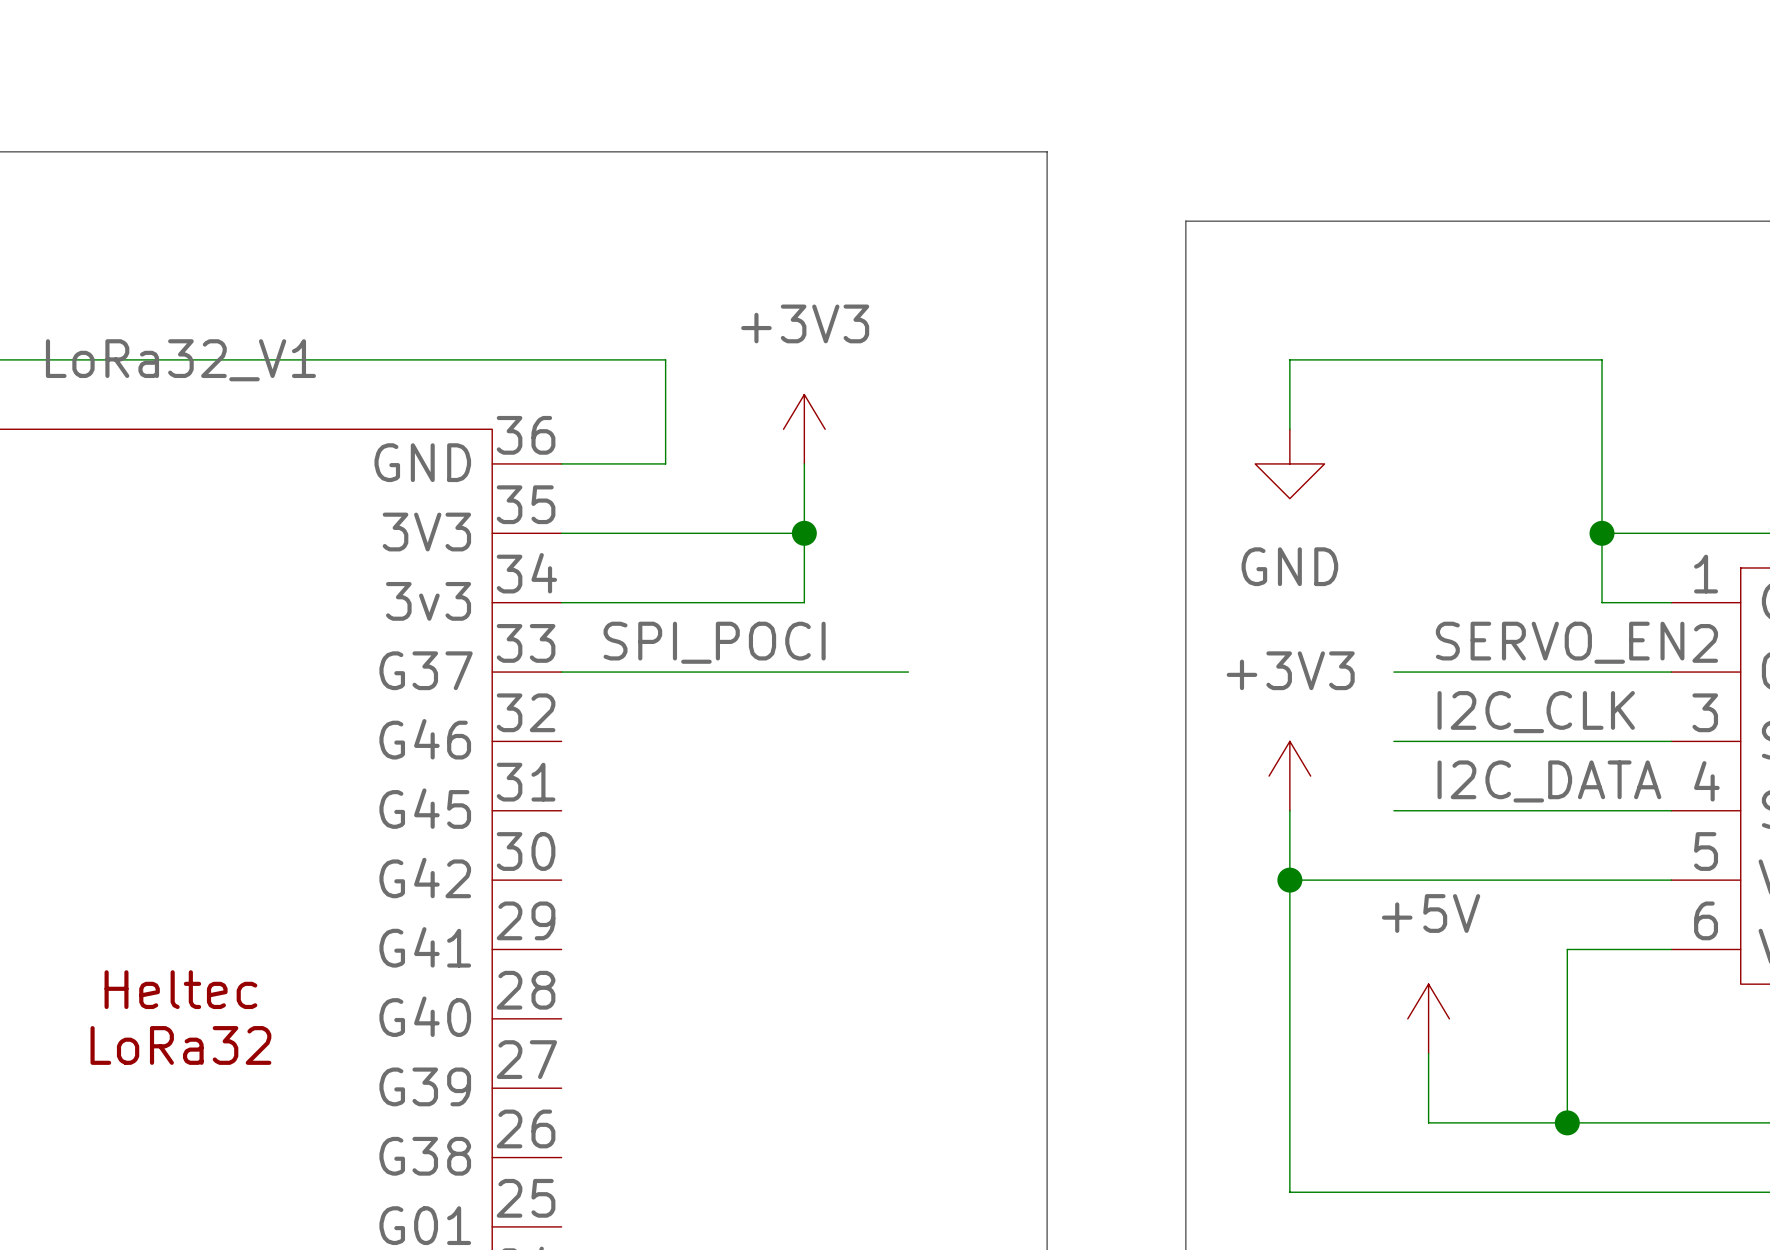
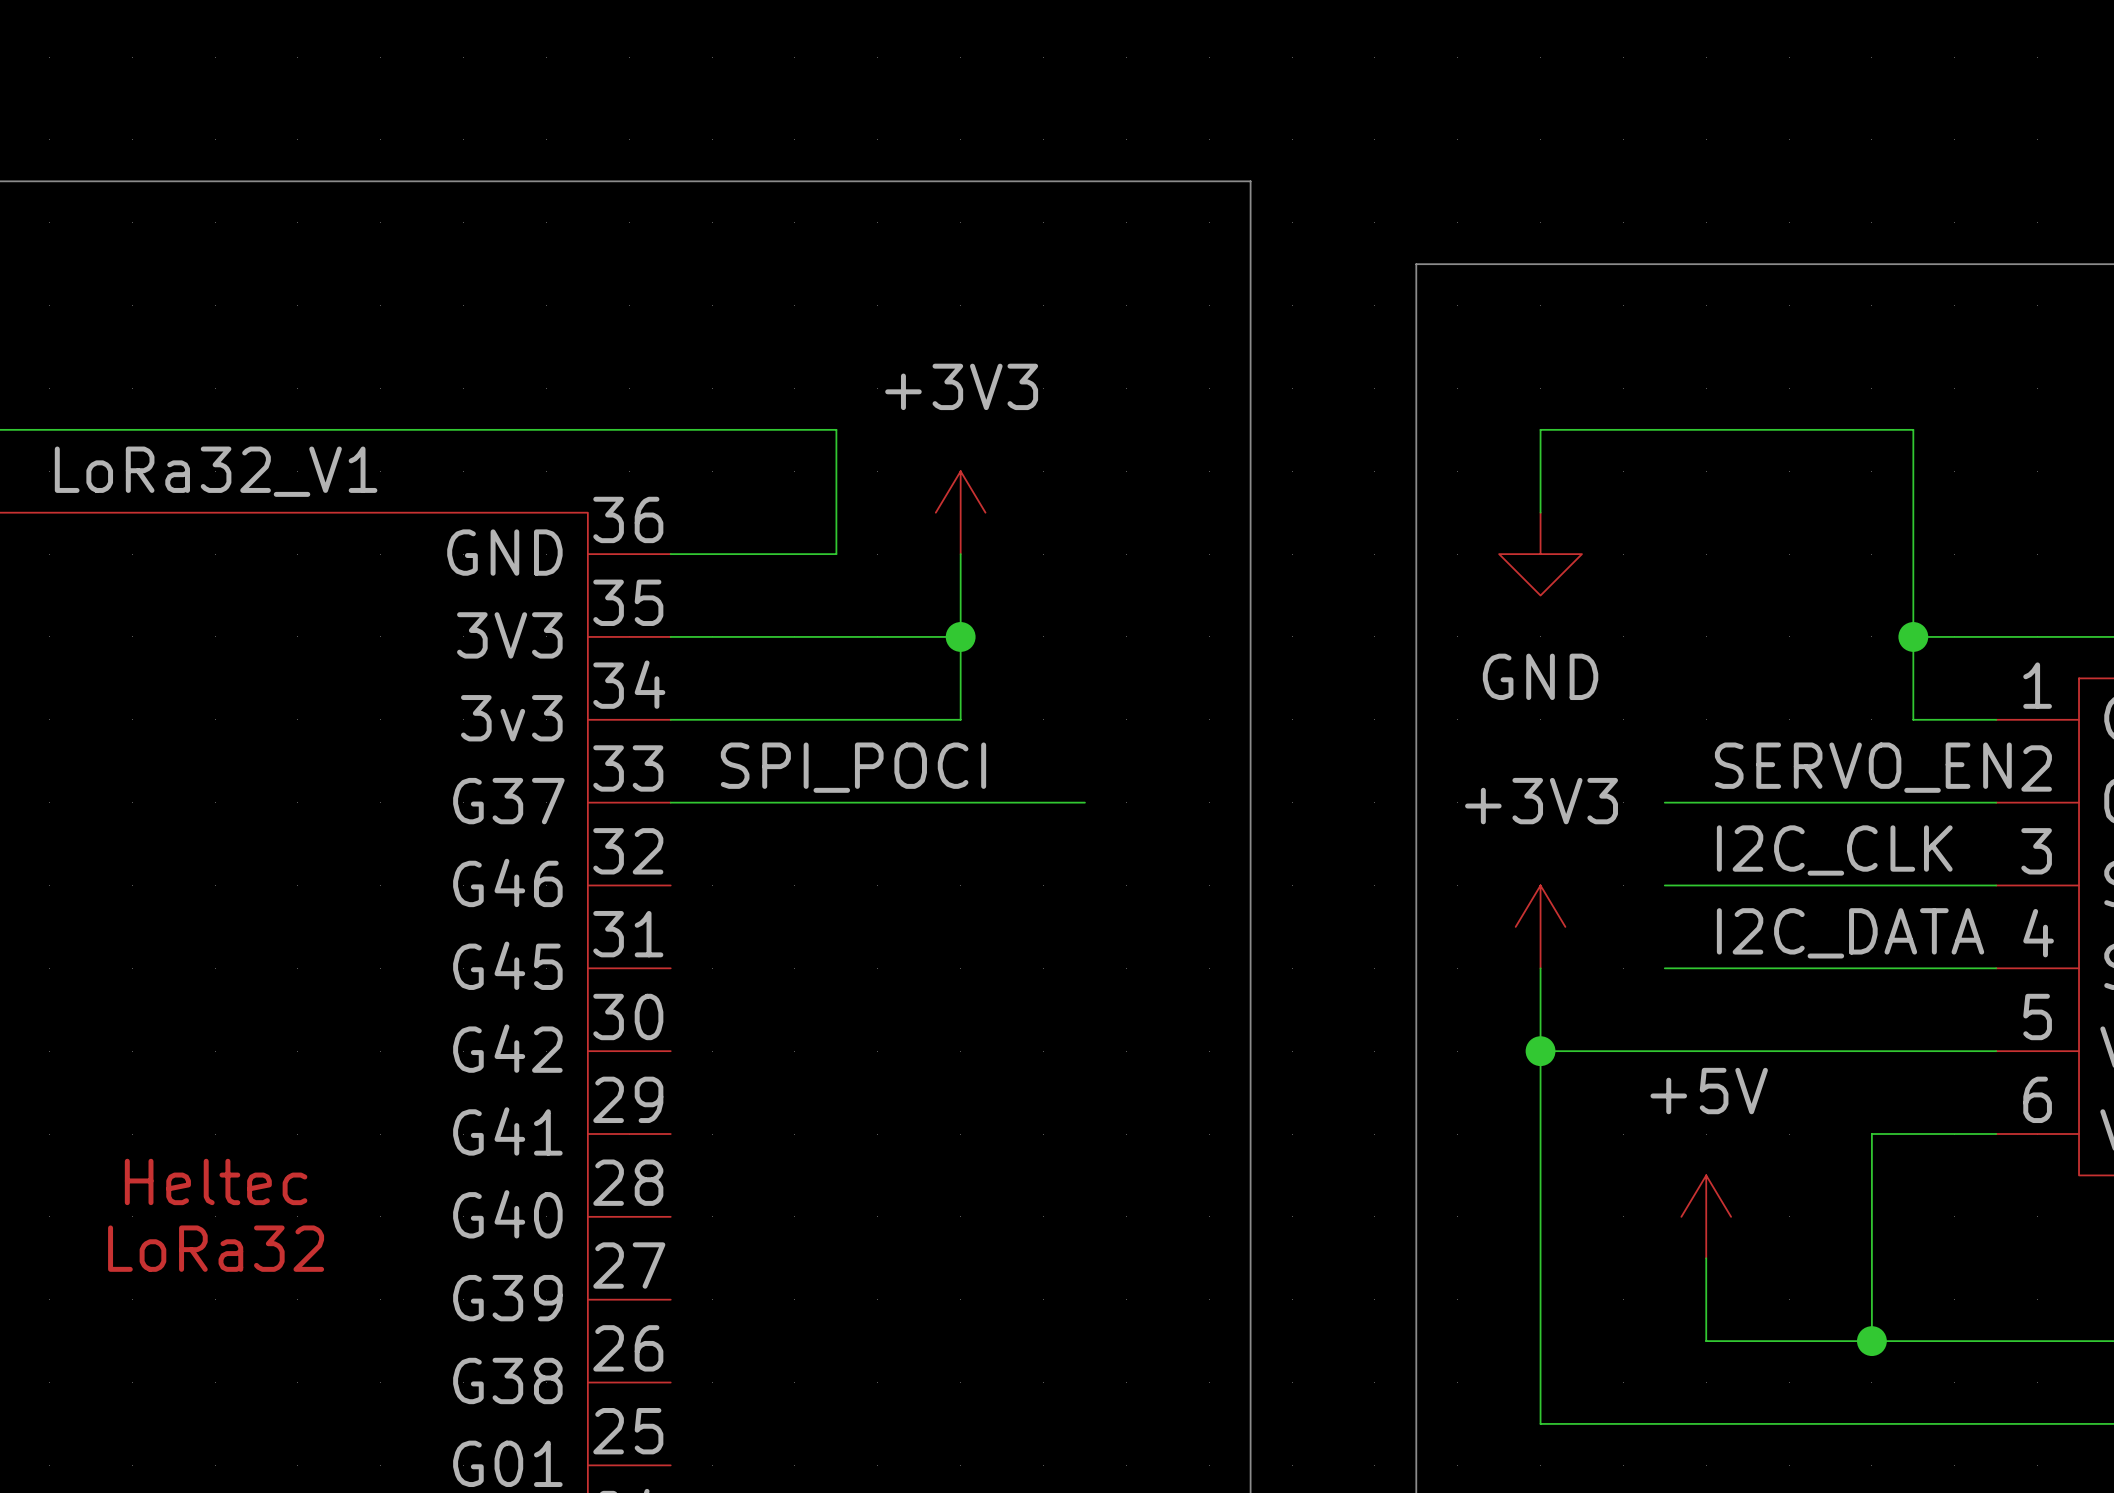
wire: (665, 359) (665, 463) -> (794, 429) (836, 429) (836, 554) (794, 554)
LoRa32_V1 name position: LoRa32_V1 (180, 360) -> LoRa32_V1 (216, 471)

